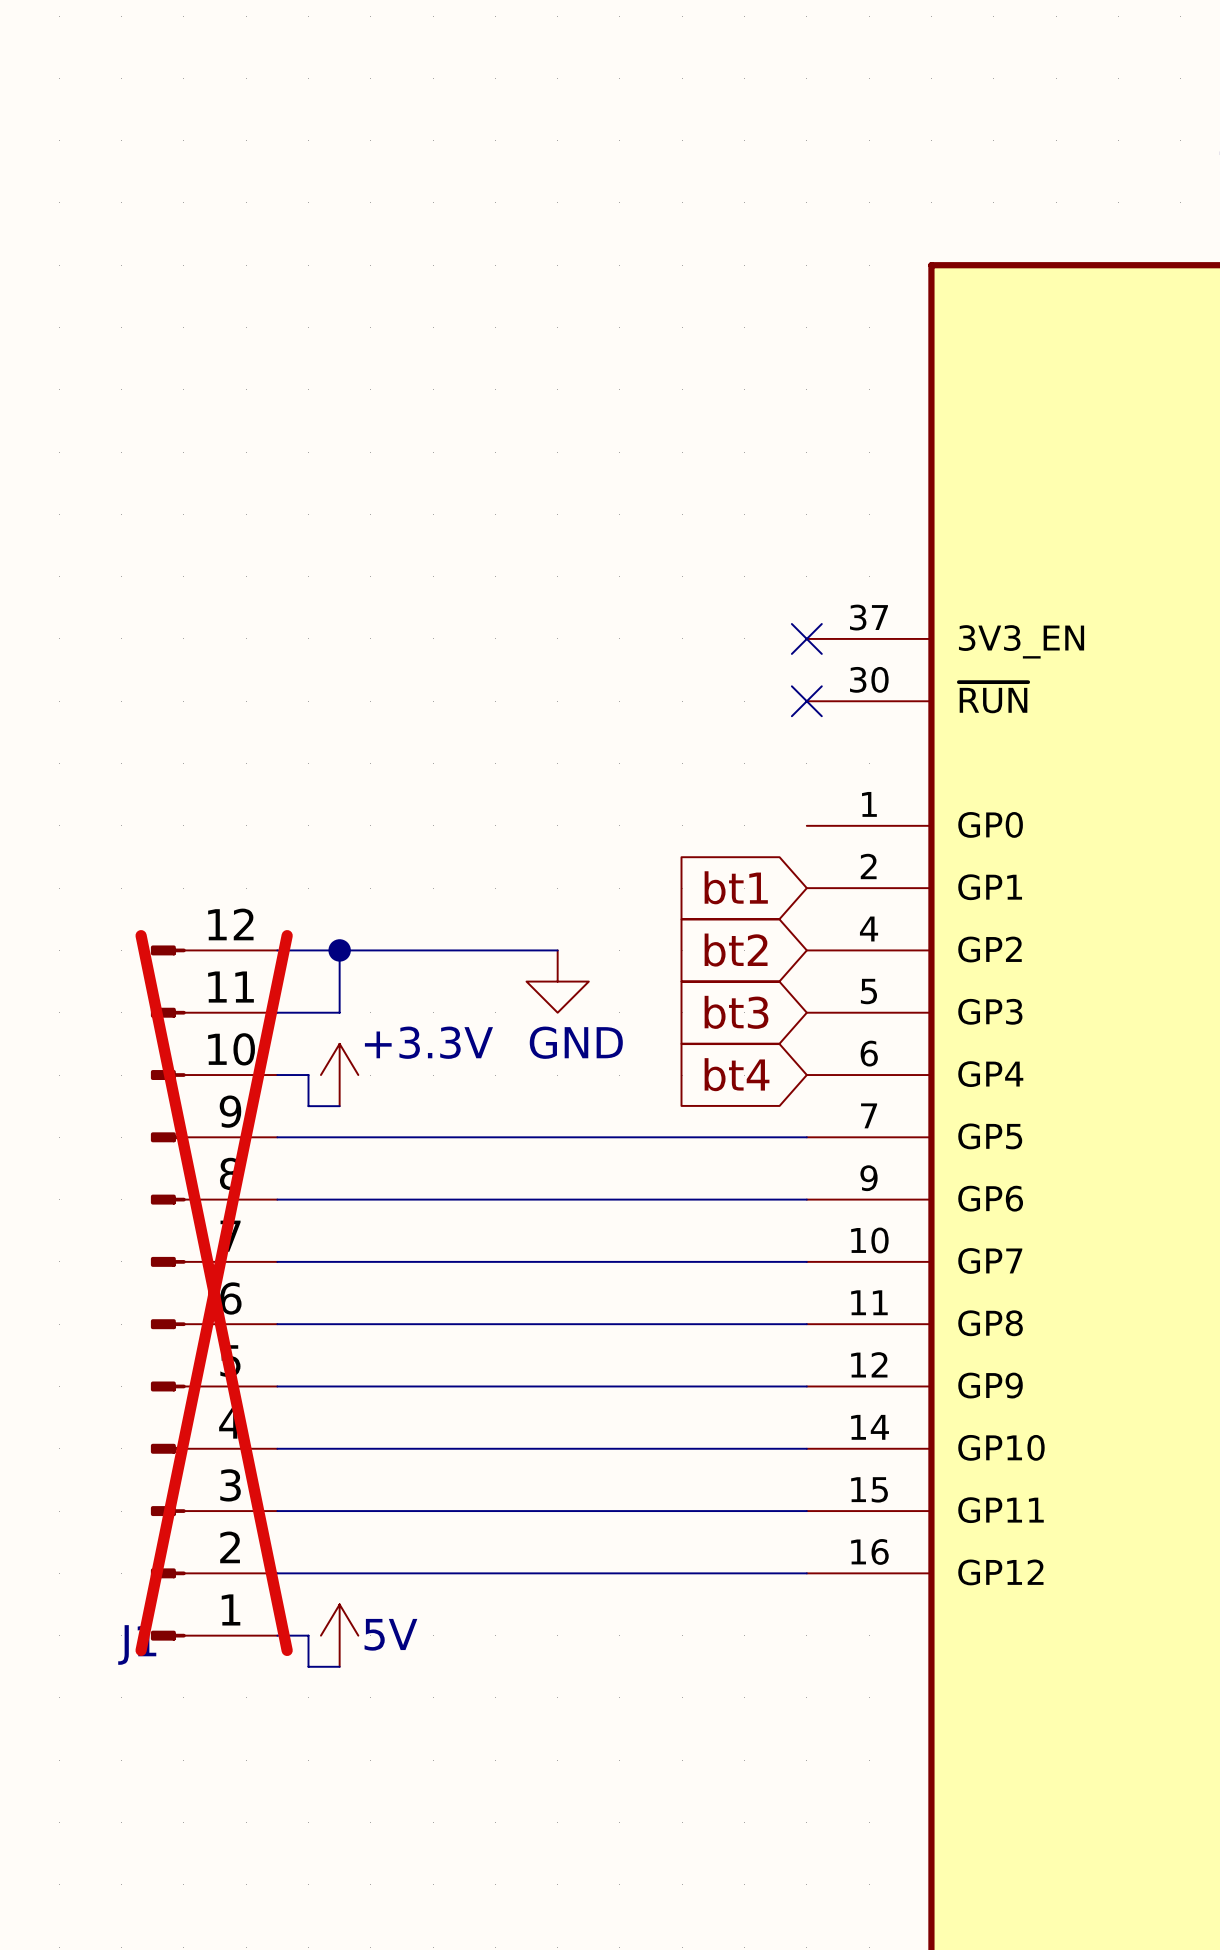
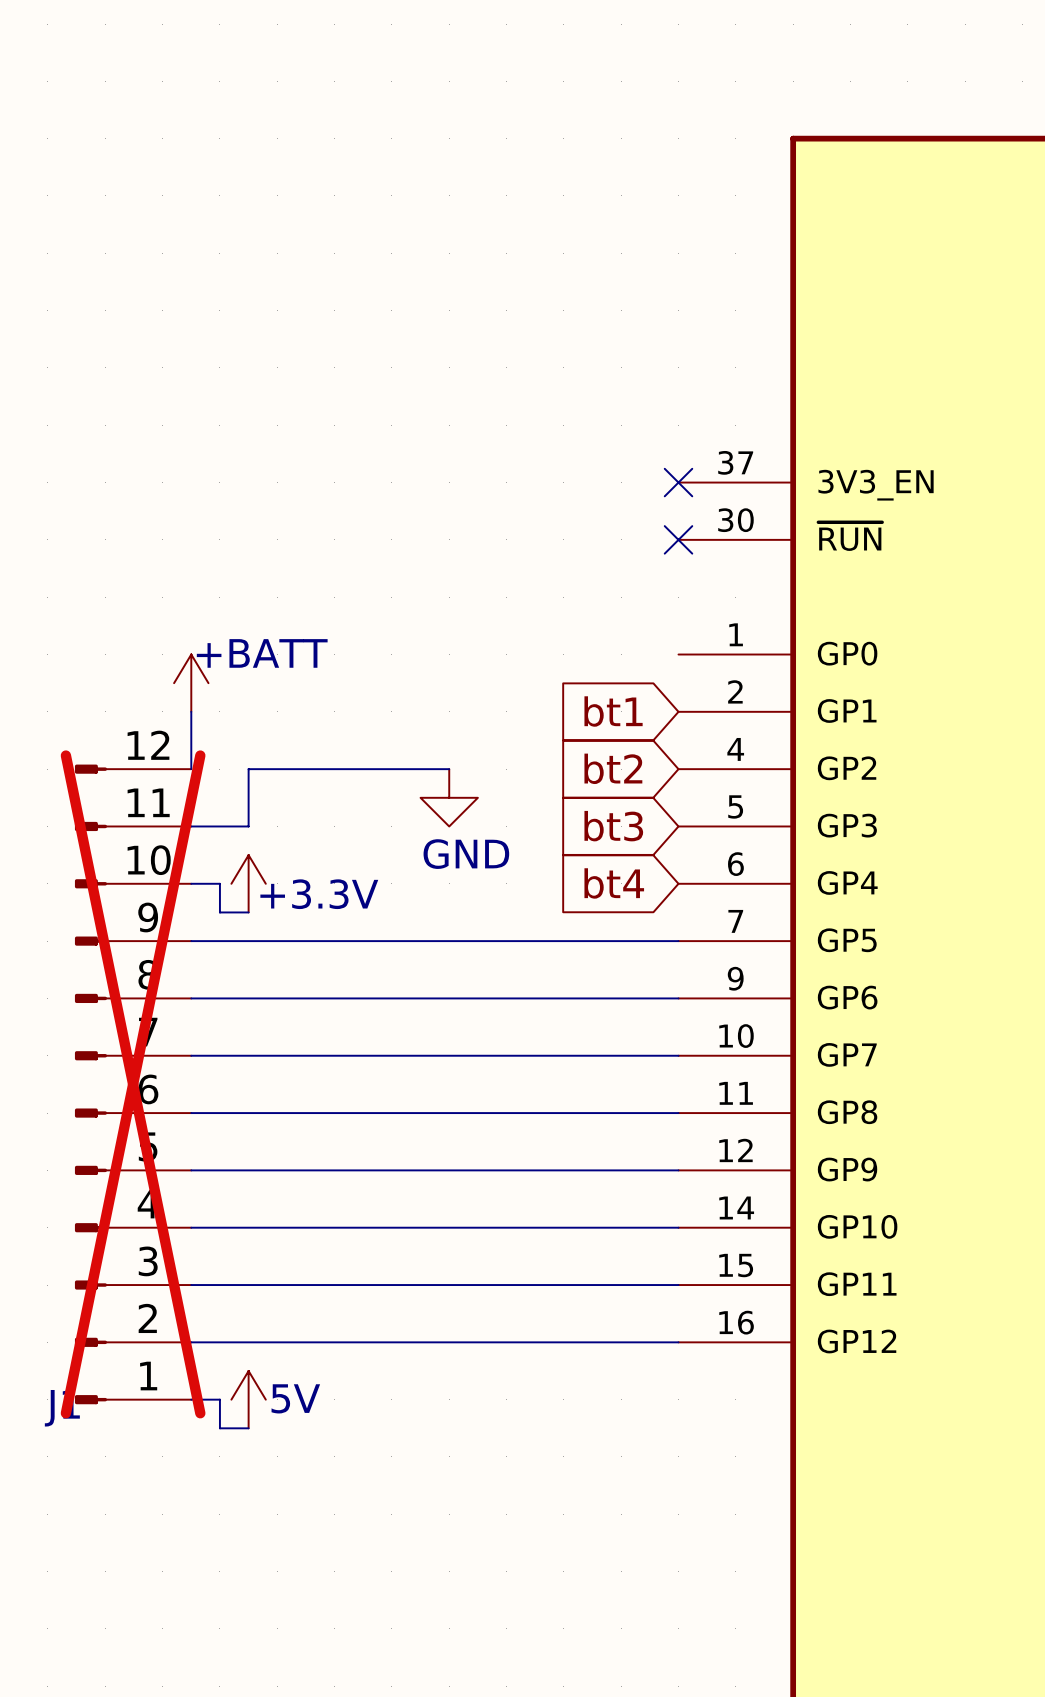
power symbol: none -> +BATT (191, 683)
wire: (277, 950) (339, 950) -> (191, 769) (191, 711)
junction: (339, 950) -> none
power symbol text position: +3.3V (428, 1042) -> +3.3V (319, 894)

